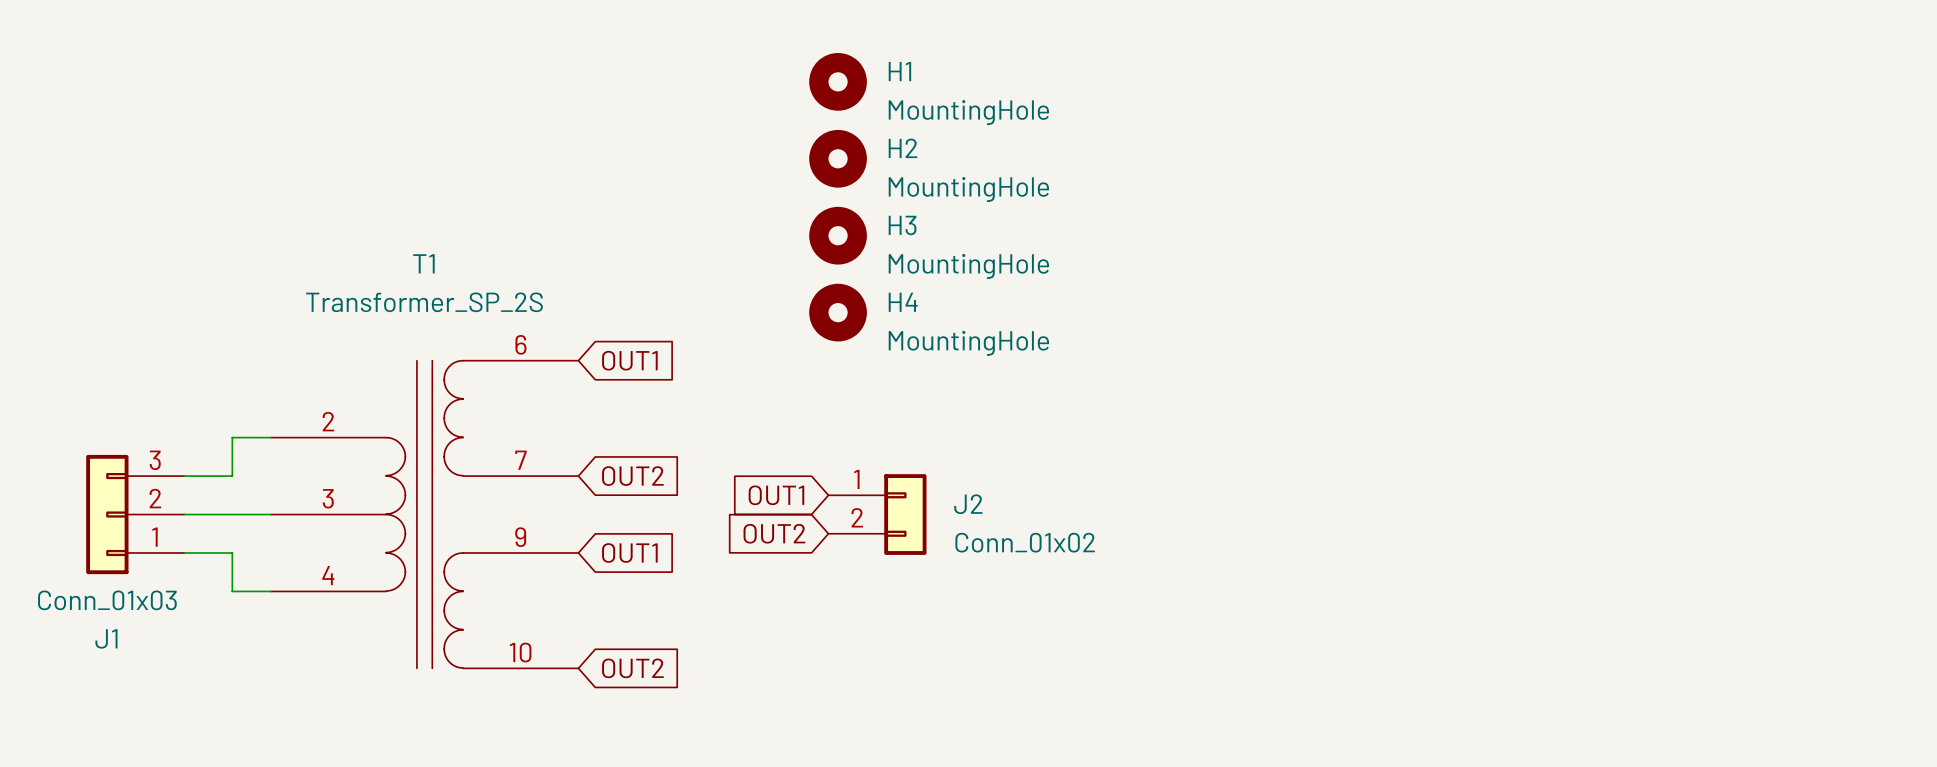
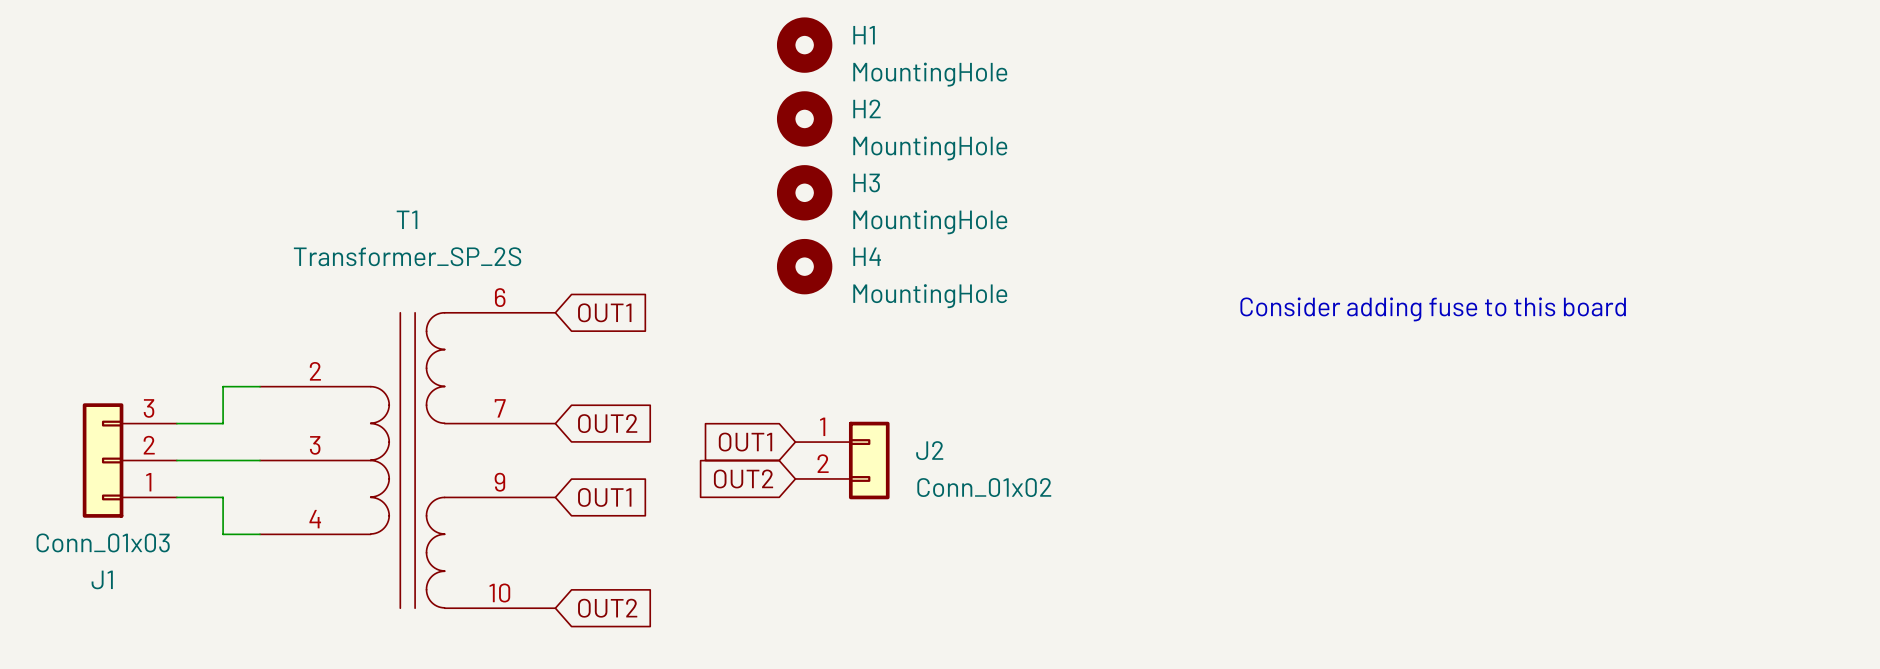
text: none -> Consider adding fuse to this board (1433, 309)

